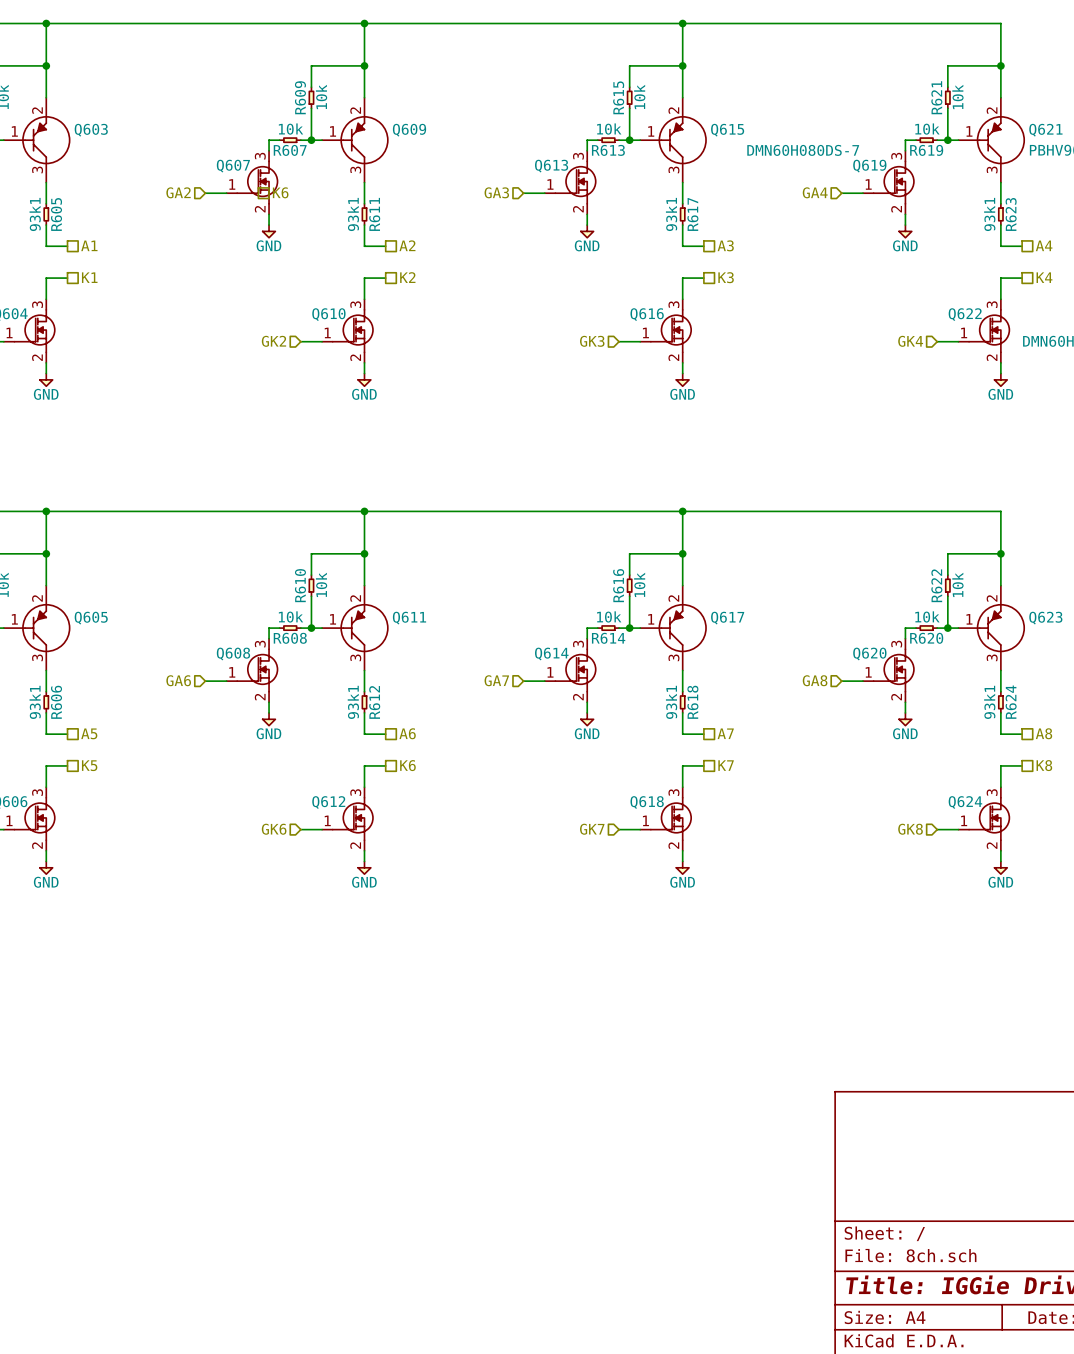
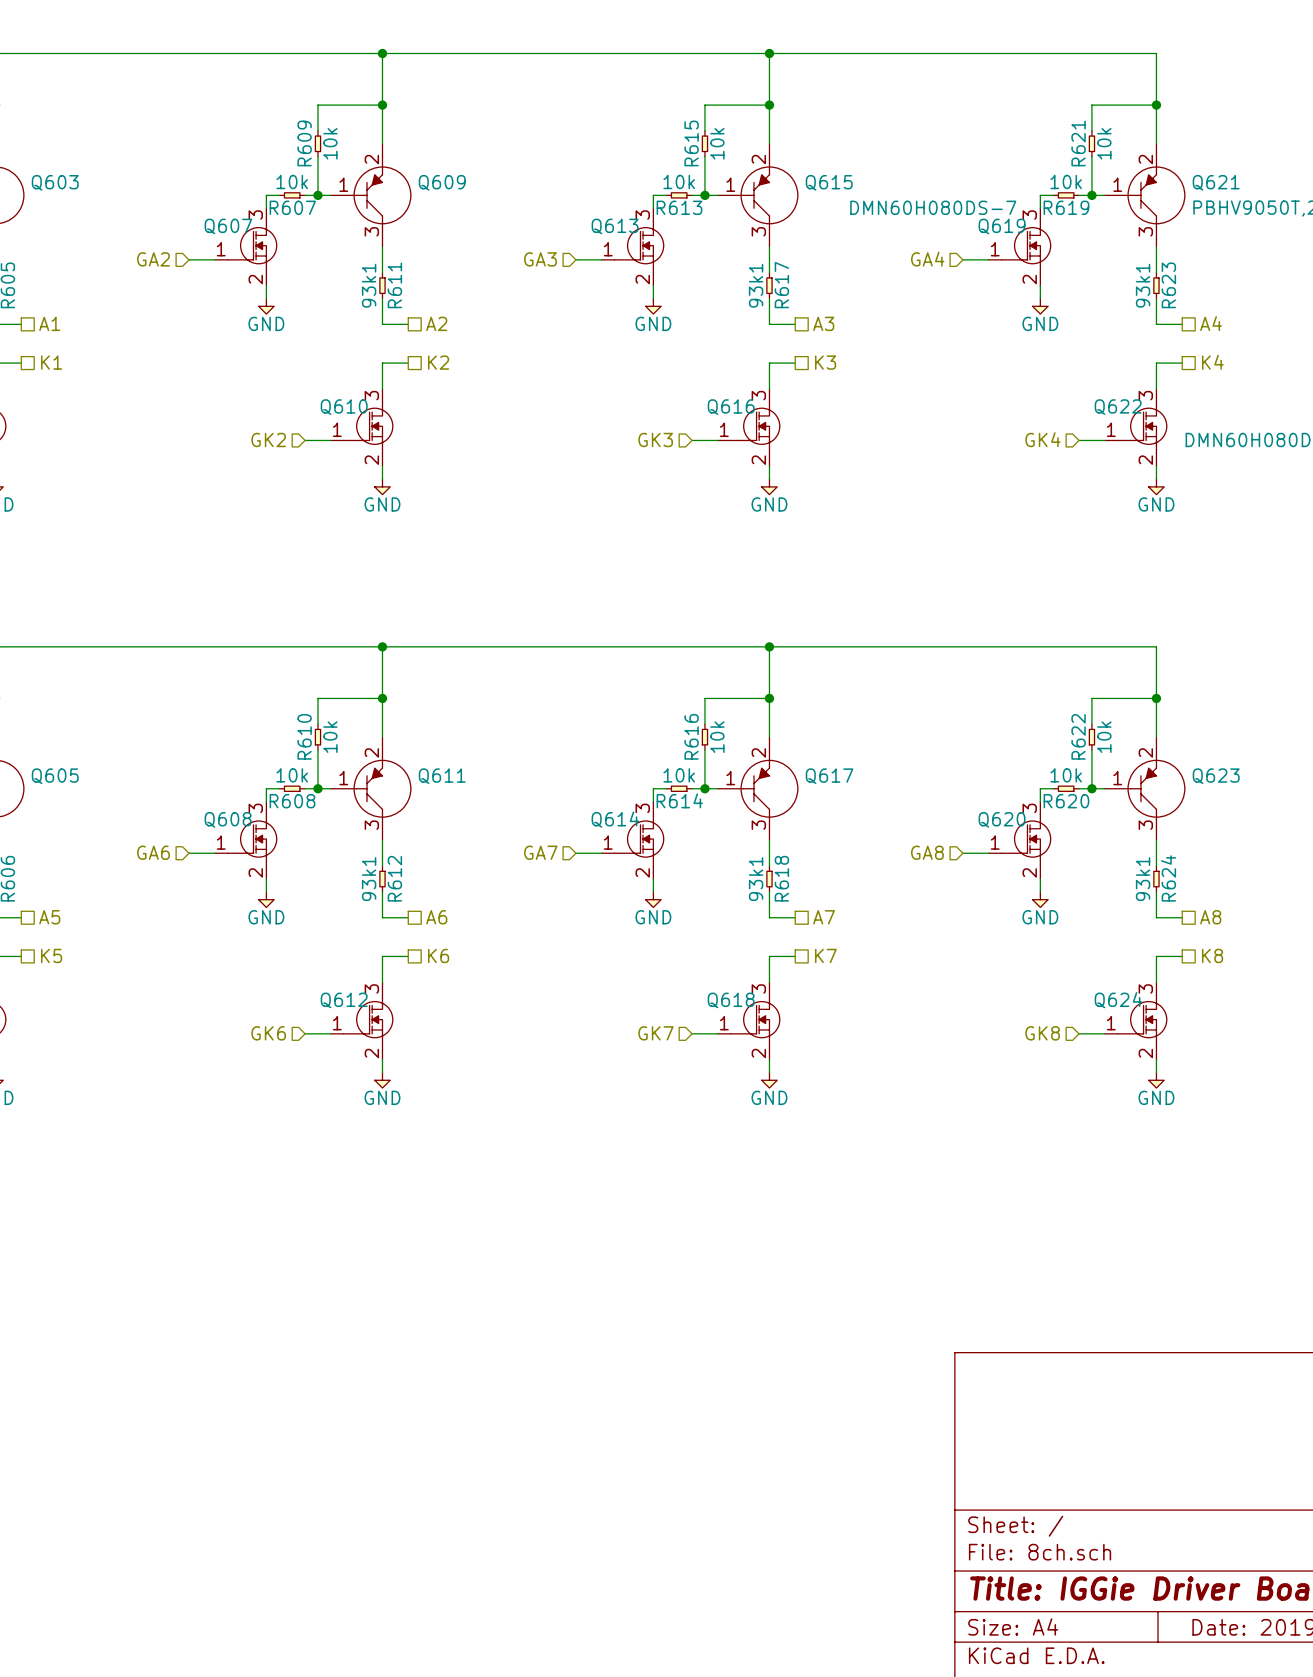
hierarchical label: K6 (280, 192) -> none

